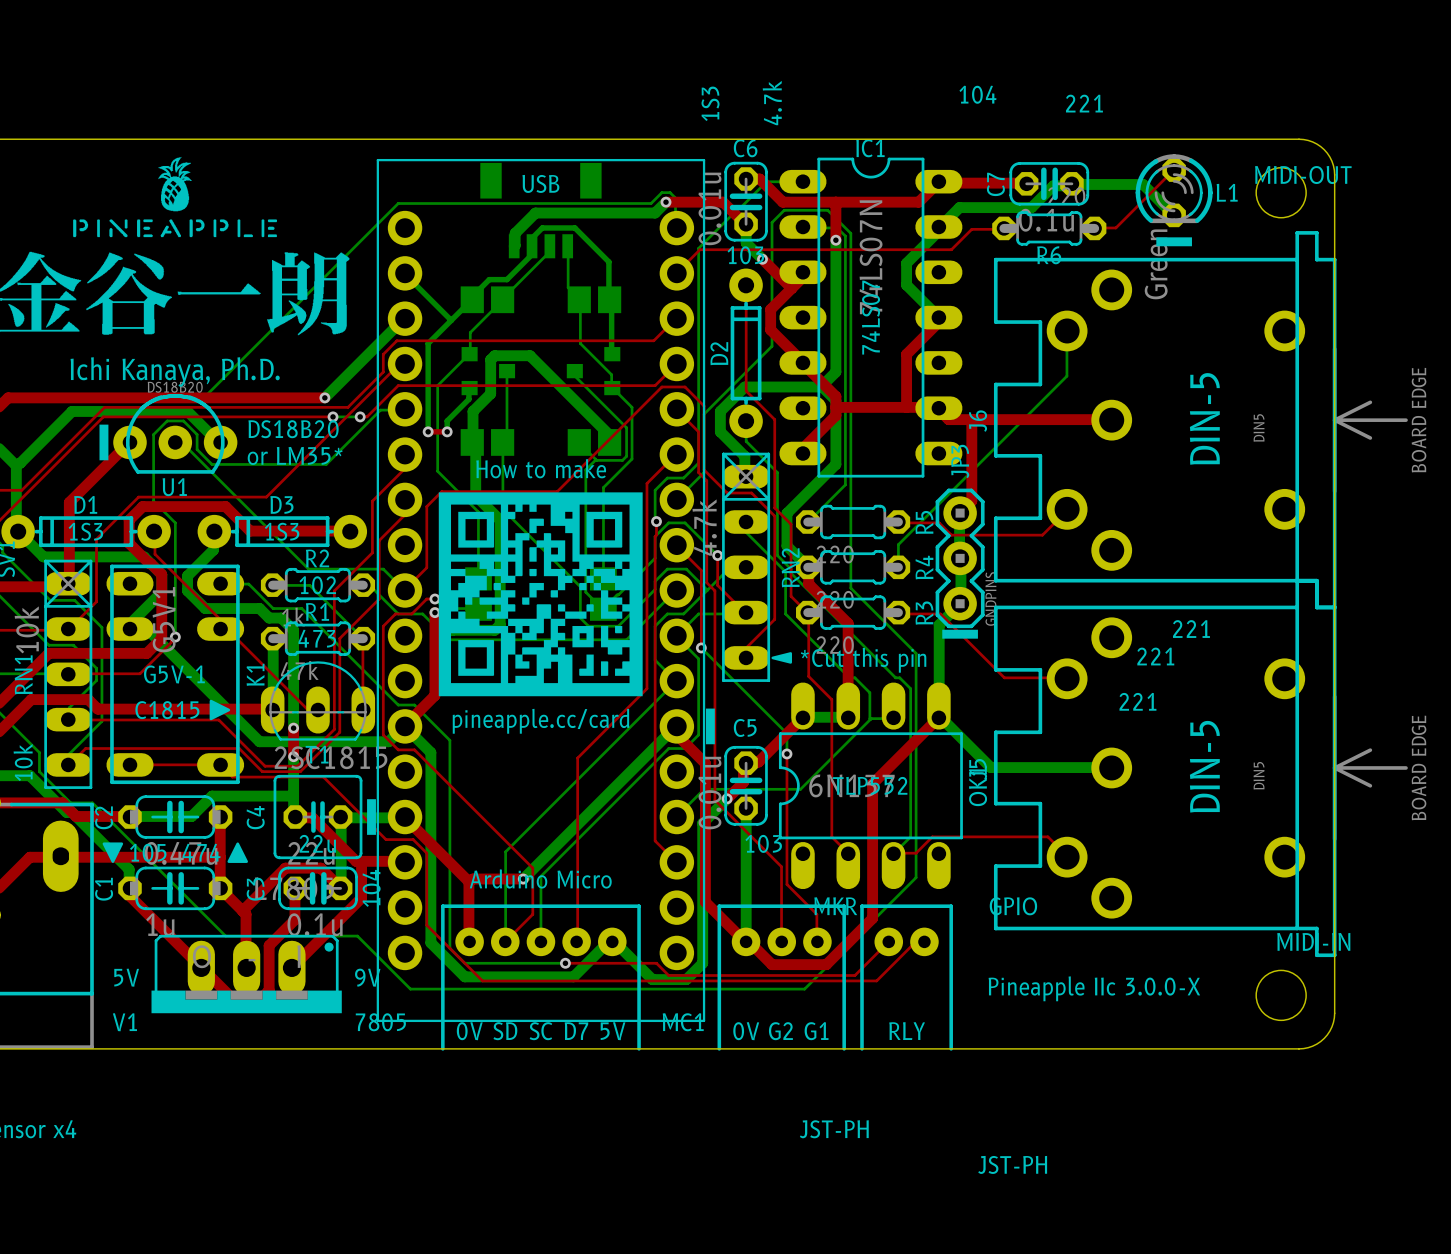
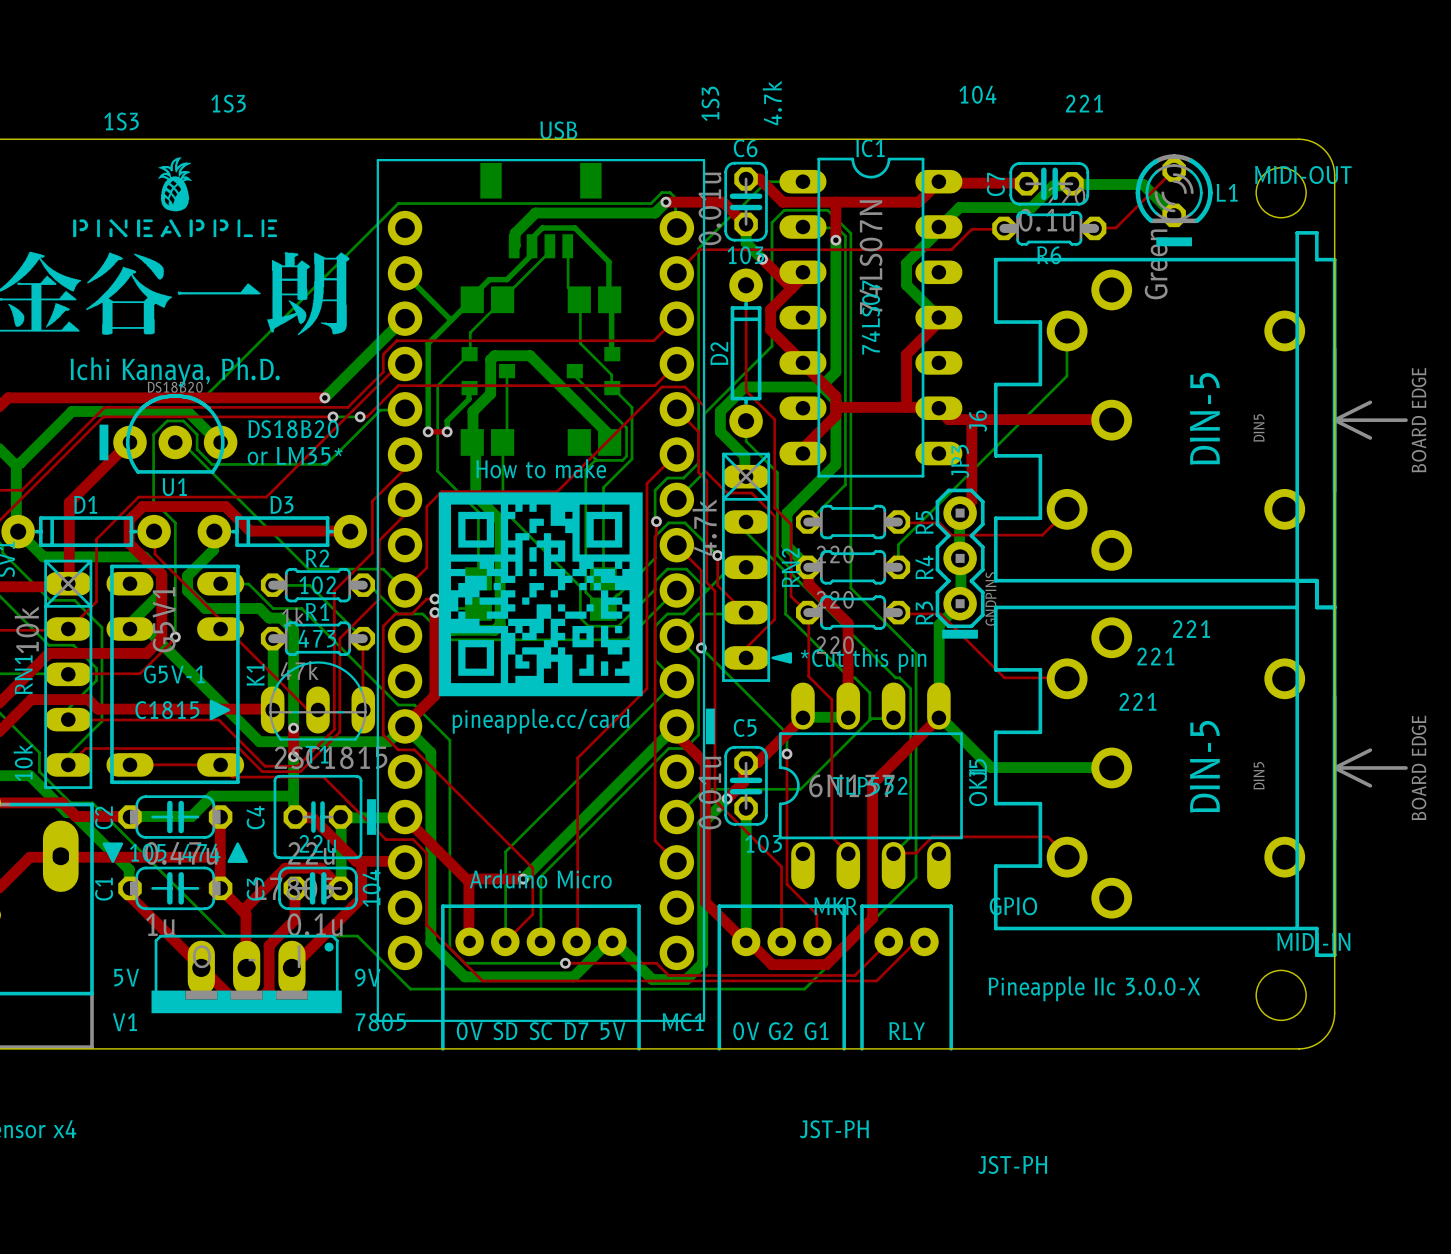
text: none -> 1S3 (228, 103)
text: none -> 1S3 (121, 121)
text position: USB (540, 183) -> USB (558, 130)
text: 1S3 (85, 531) -> none
text: 1S3 (282, 531) -> none

